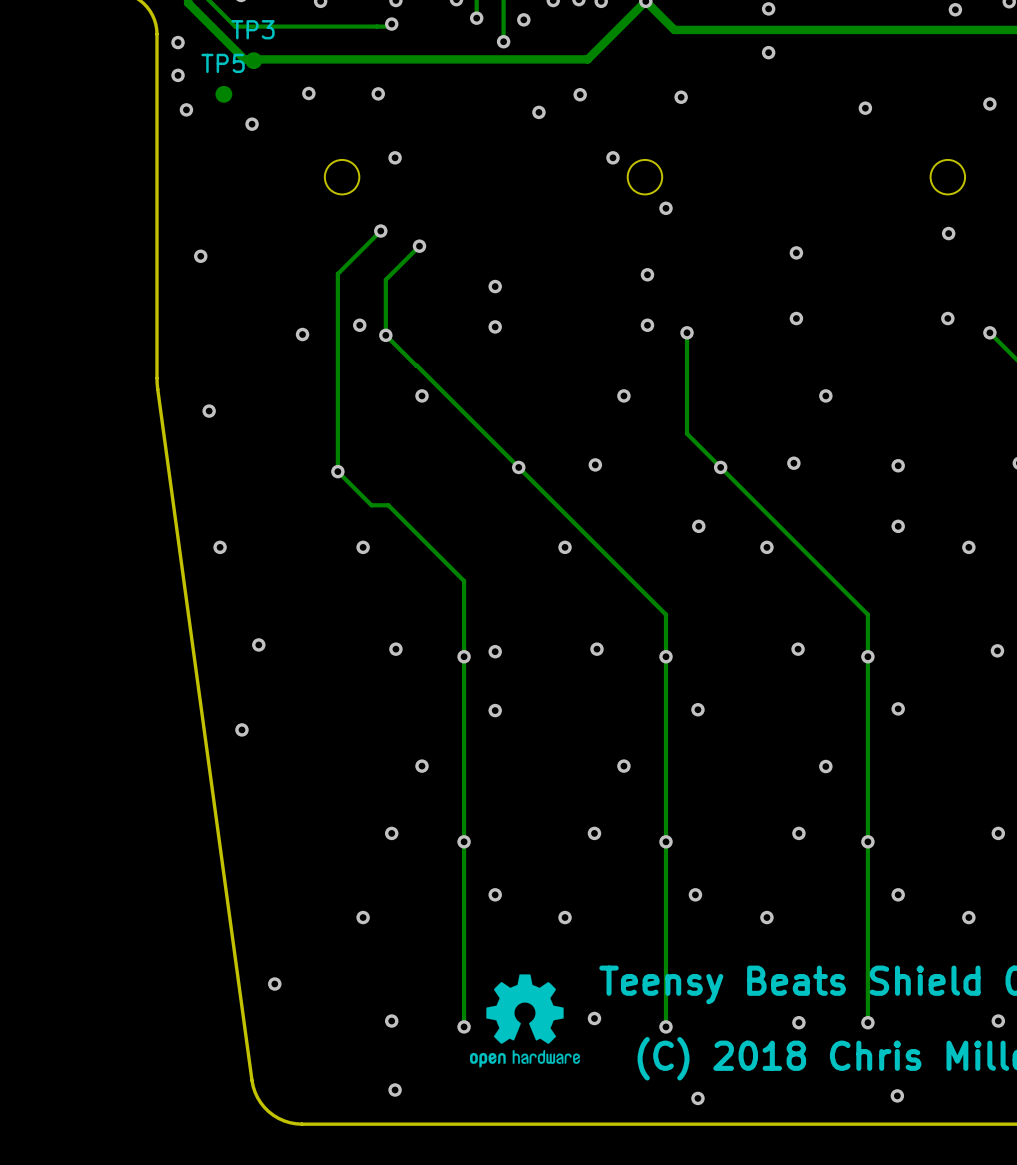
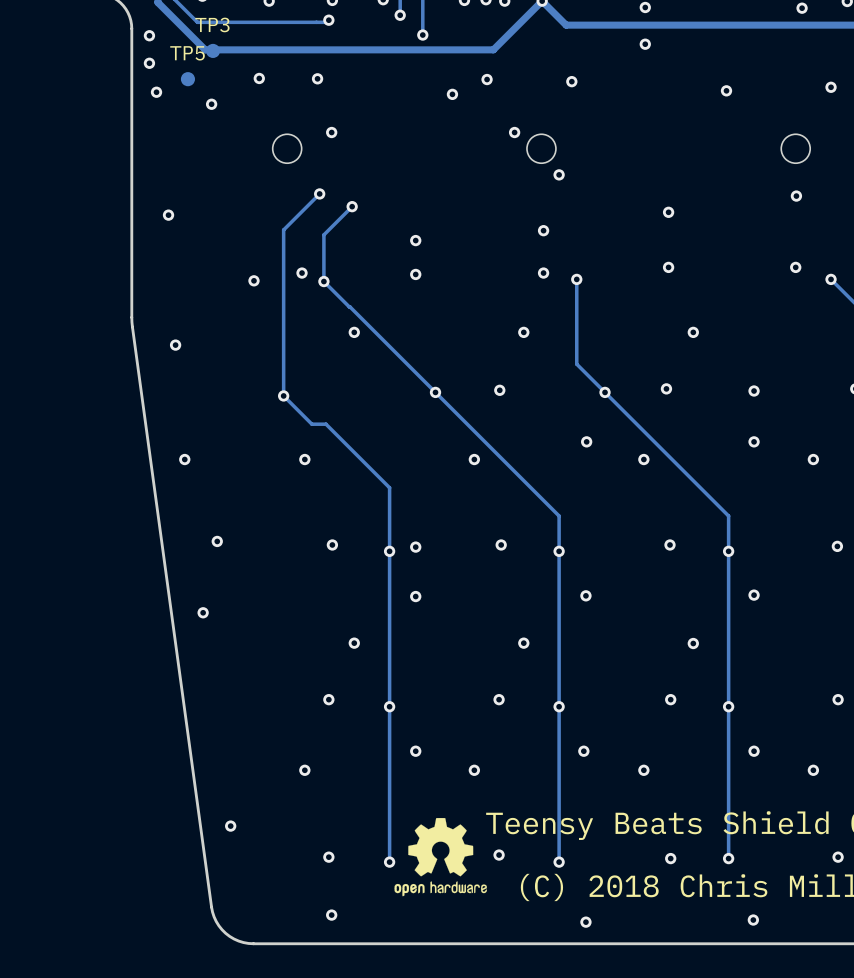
via: (523, 19) -> none

